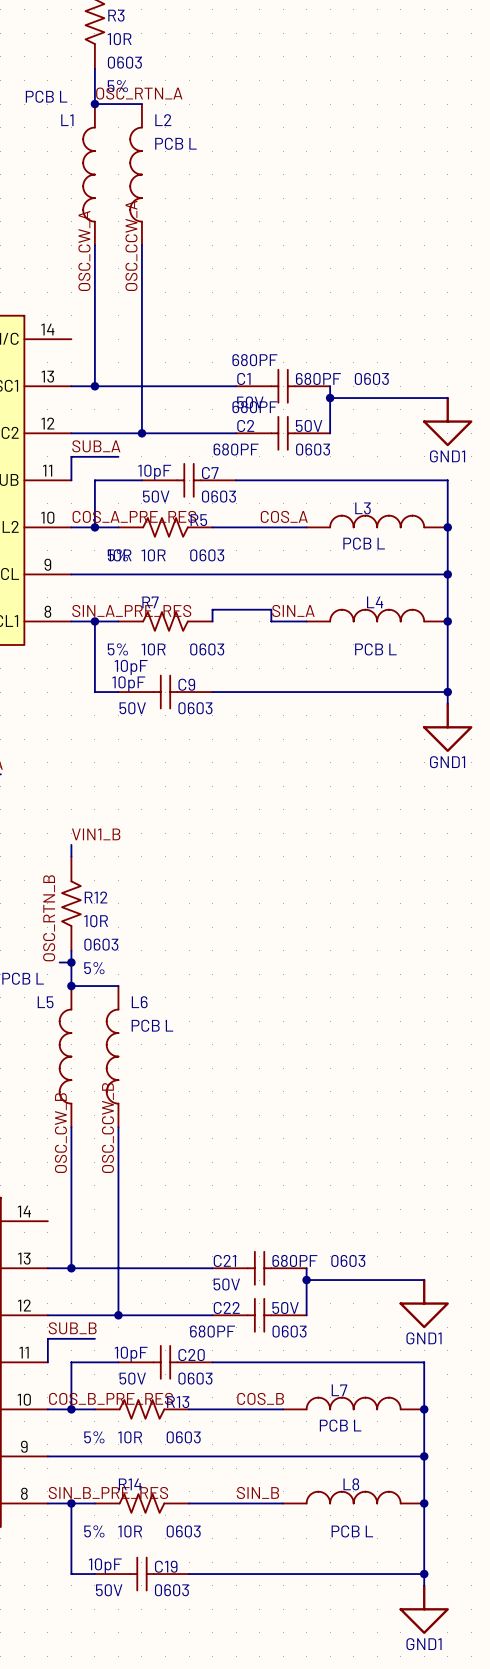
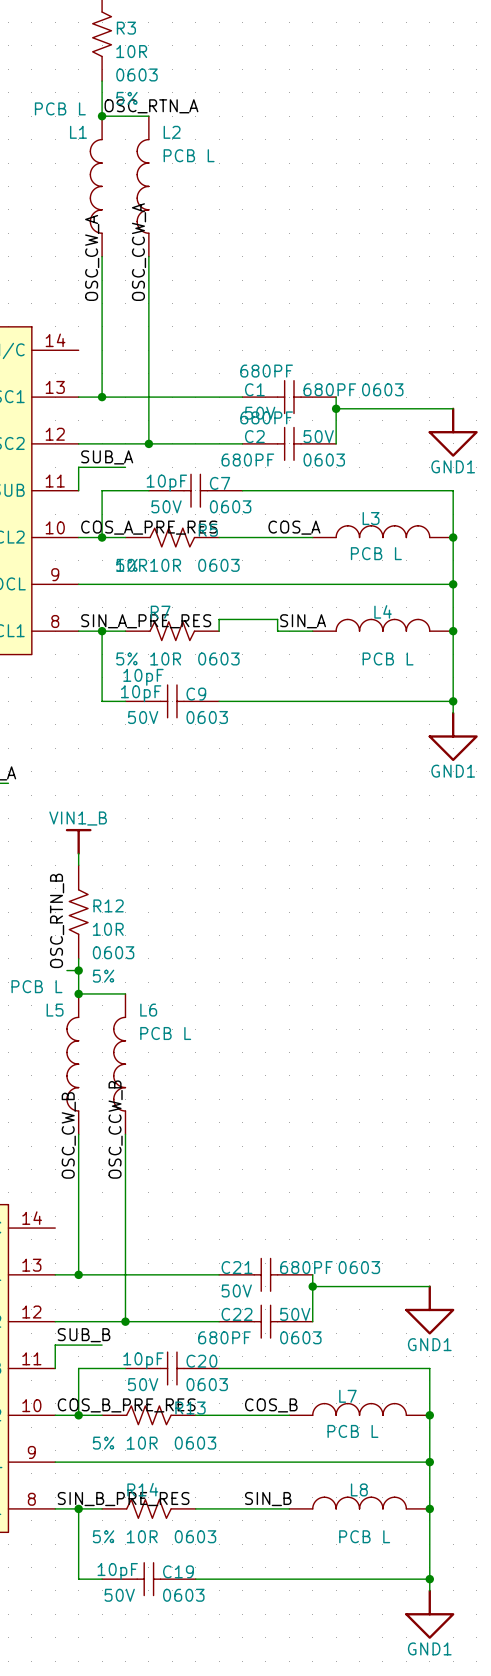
power symbol: none -> VIN1_B (78, 841)
label: VIN1_B (96, 834) -> none

